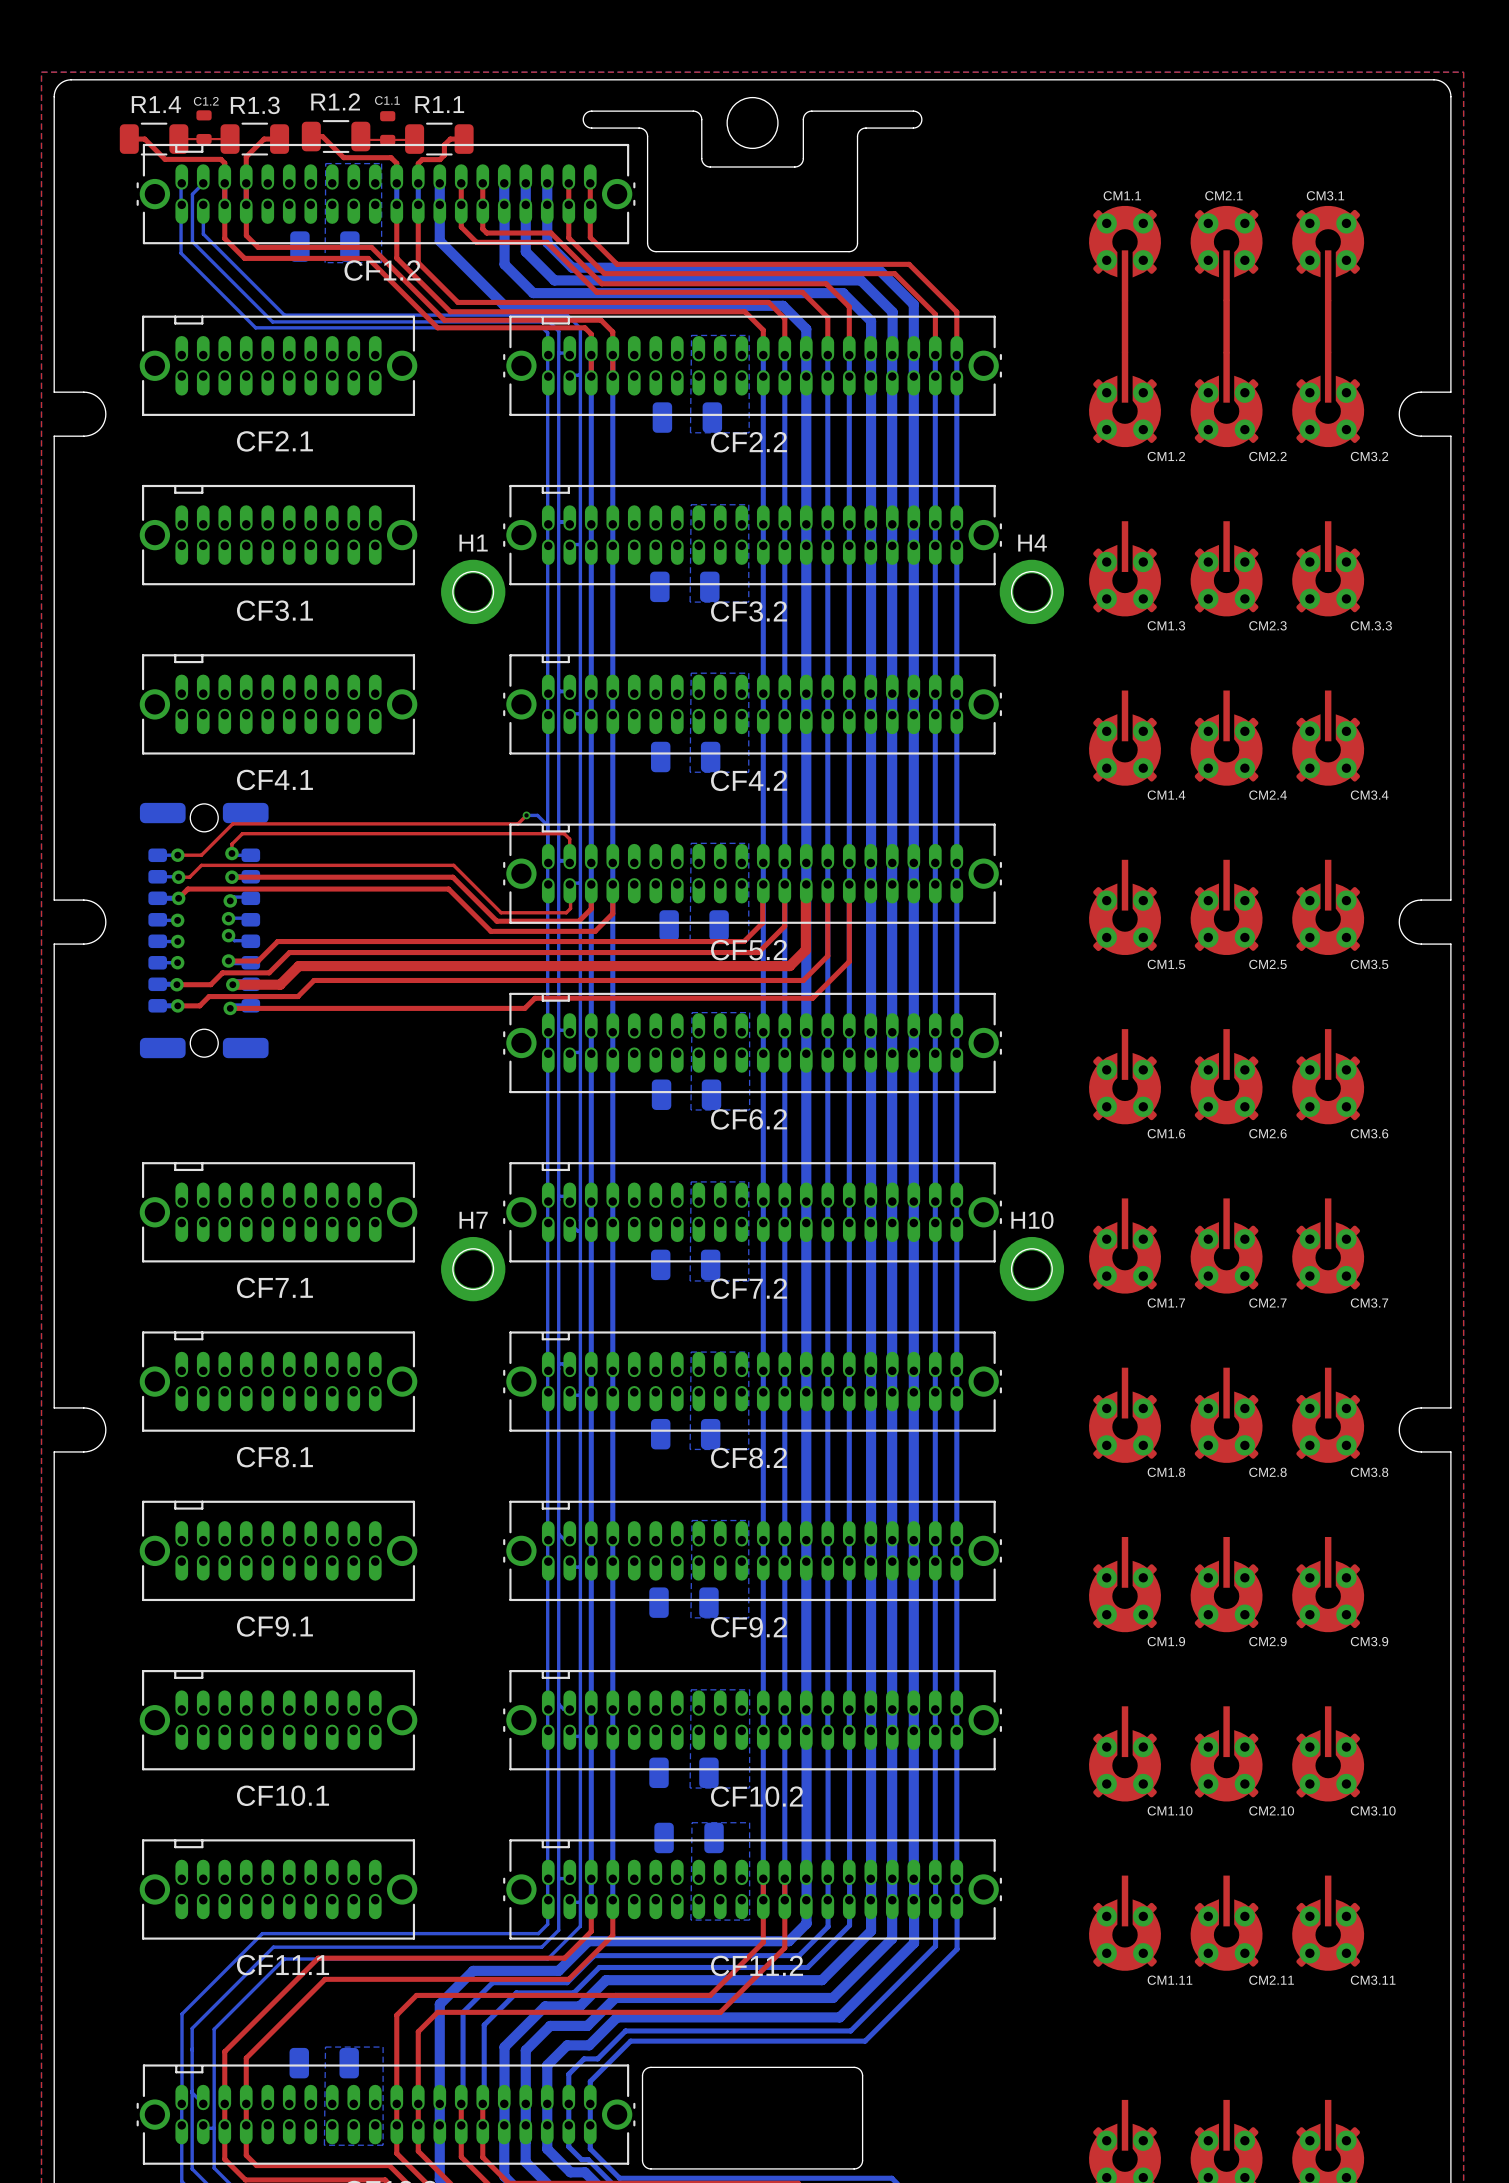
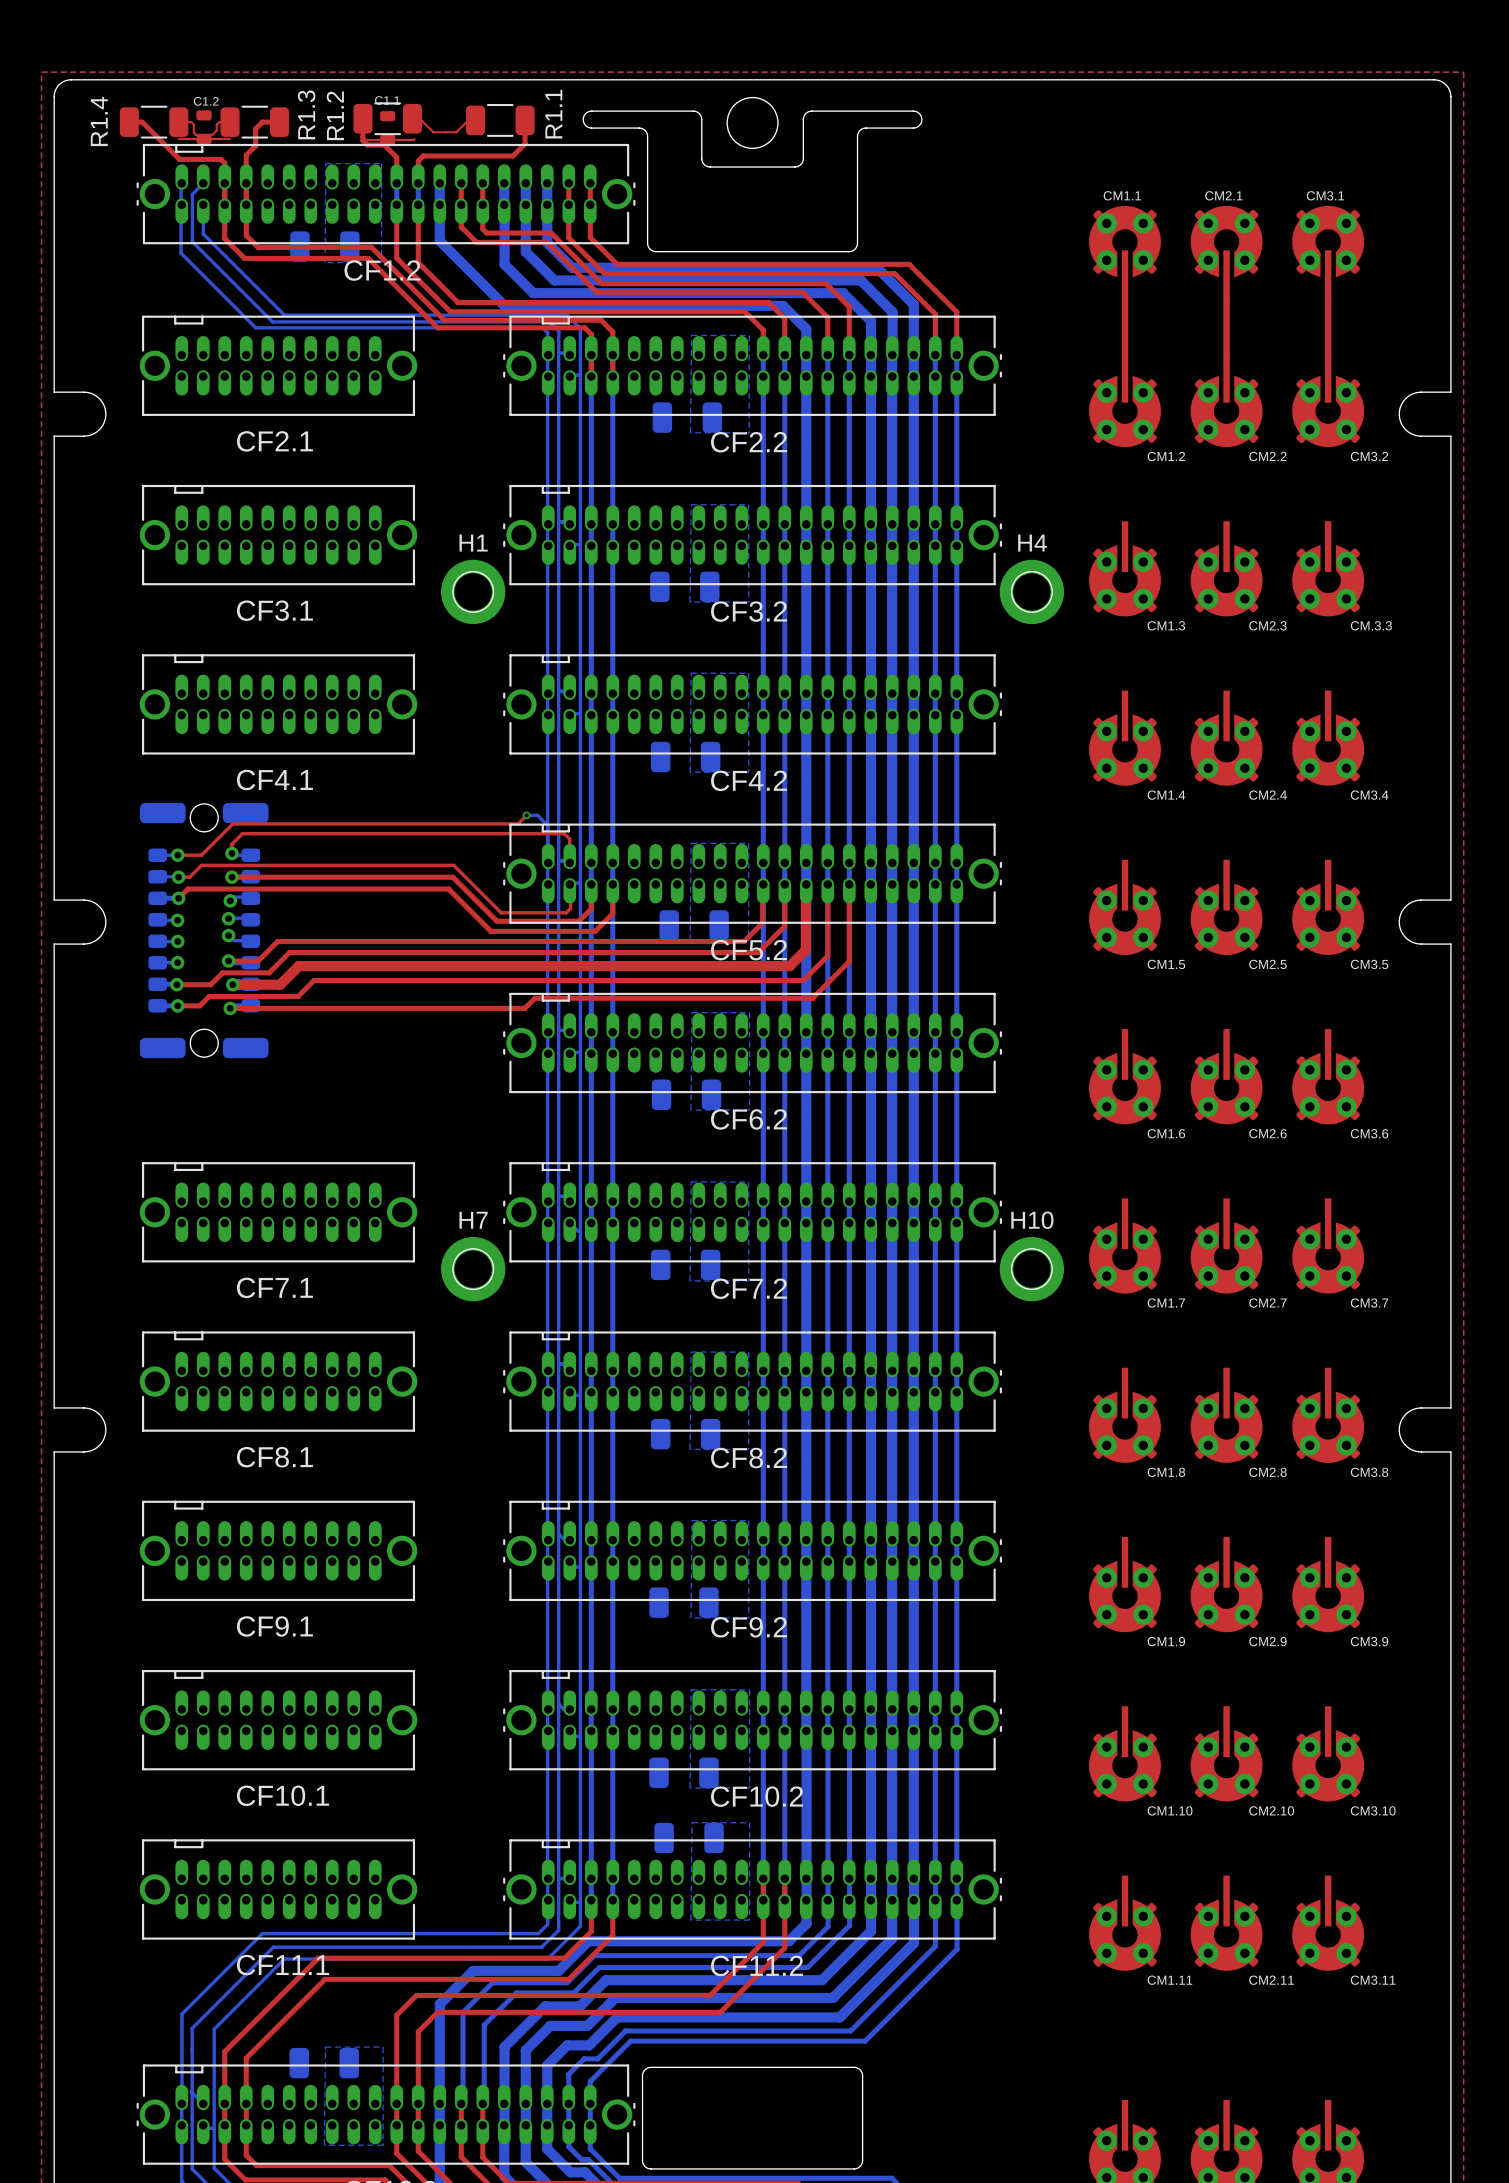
R1.2 name rotation: 0° (335, 101) -> 90° counterclockwise (335, 115)
R1.4 name rotation: 0° (156, 104) -> 90° counterclockwise (99, 121)
R1.1 name rotation: 0° (439, 104) -> 90° counterclockwise (553, 114)
R1.3 name rotation: 0° (255, 105) -> 90° counterclockwise (306, 114)
top track: none -> (412, 118) (419, 118) (433, 132) (456, 132) (468, 120) (475, 120)
top track: none -> (178, 122) (191, 122) (193, 124) (195, 134) (212, 134) (216, 130) (216, 124) (219, 122) (230, 122)
top track: (311, 136) (322, 136) (343, 157) (391, 157) (396, 163) -> (362, 118) (362, 140) (367, 144) (384, 144) (396, 157) (396, 163)
R1.2 position: (336, 136) -> (387, 118)
top track: (129, 139) (144, 139) (165, 159) (179, 159) -> (129, 122) (142, 122) (179, 159)
R1.4 position: (154, 139) -> (154, 122)
R1.3 position: (254, 139) -> (254, 122)
top track: (279, 139) (264, 139) (246, 156) -> (279, 122) (262, 122) (255, 128) (255, 145) (246, 156)
R1.1 position: (439, 139) -> (500, 120)
top track: (464, 139) (450, 139) (444, 144) (444, 155) (439, 159) (422, 159) (418, 163) -> (525, 120) (525, 143) (512, 155) (423, 155) (418, 163)

